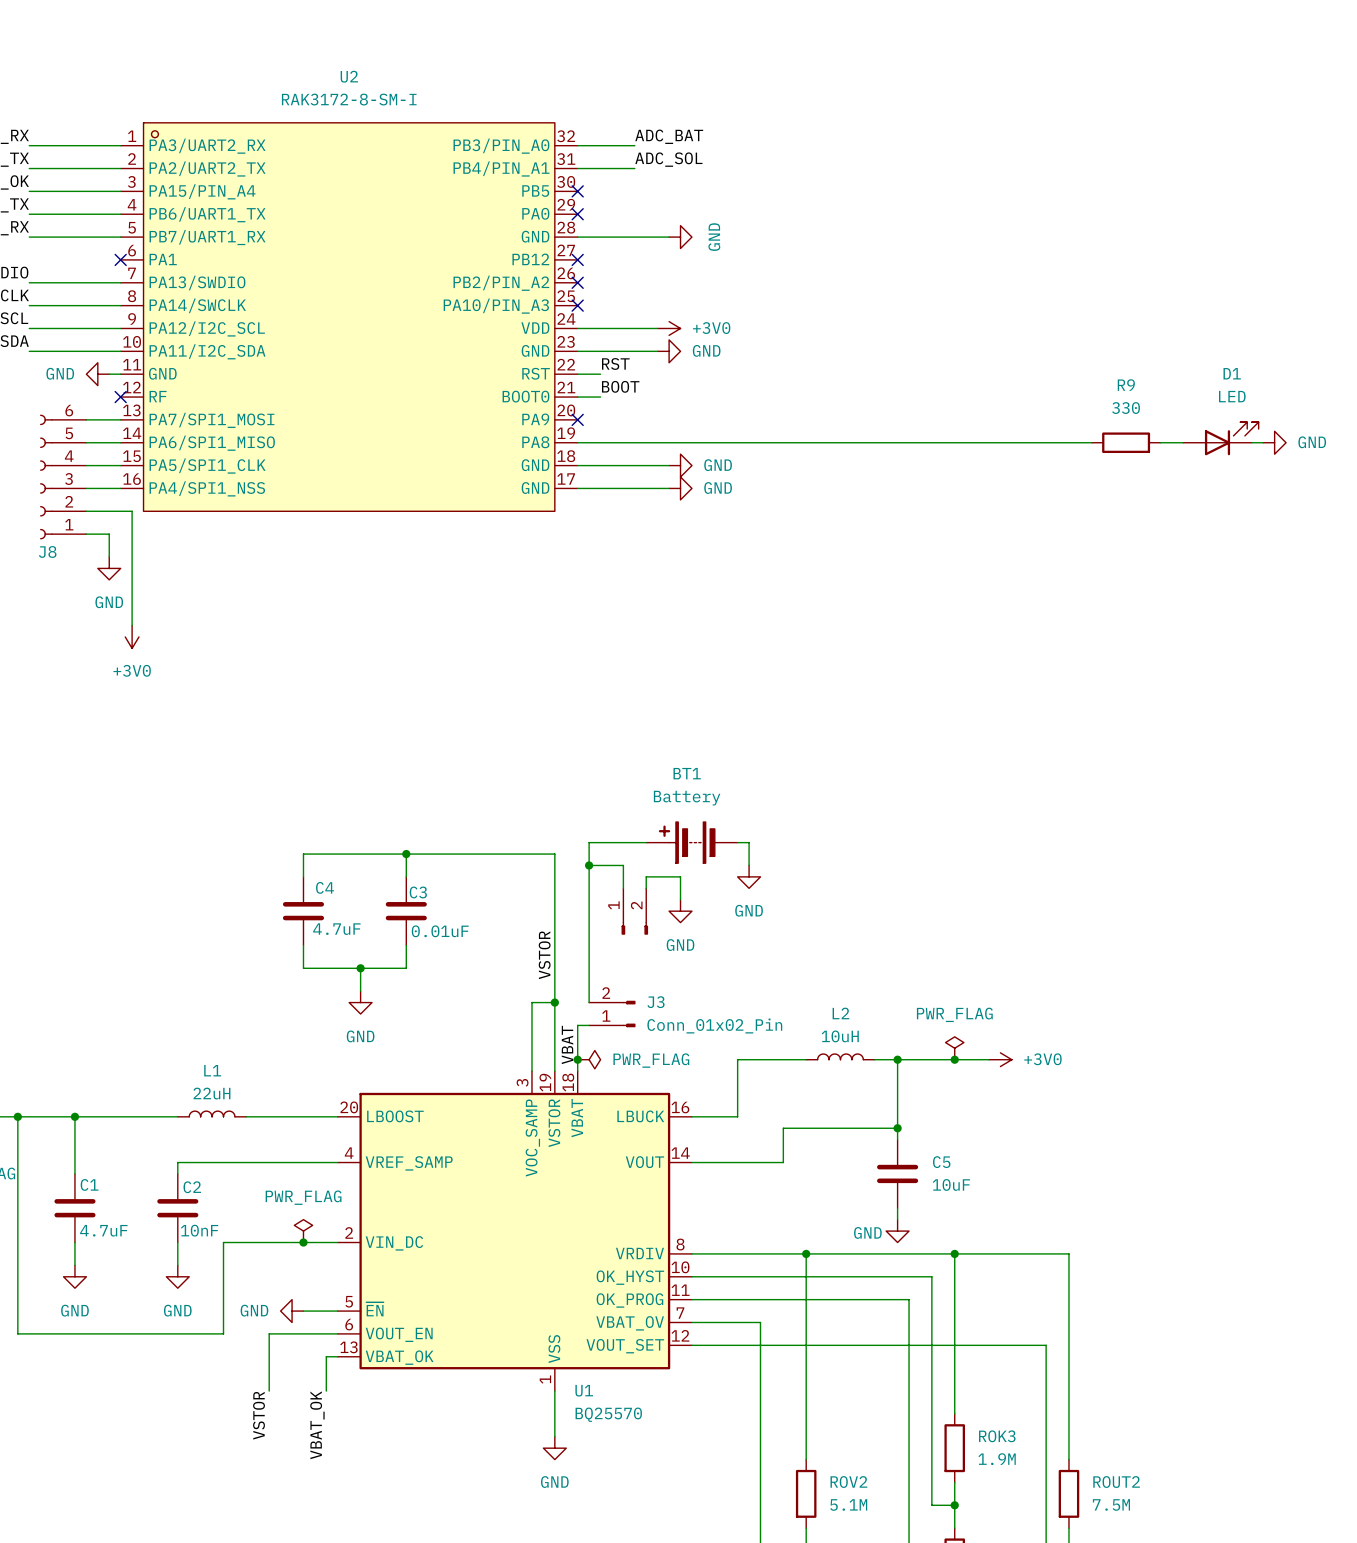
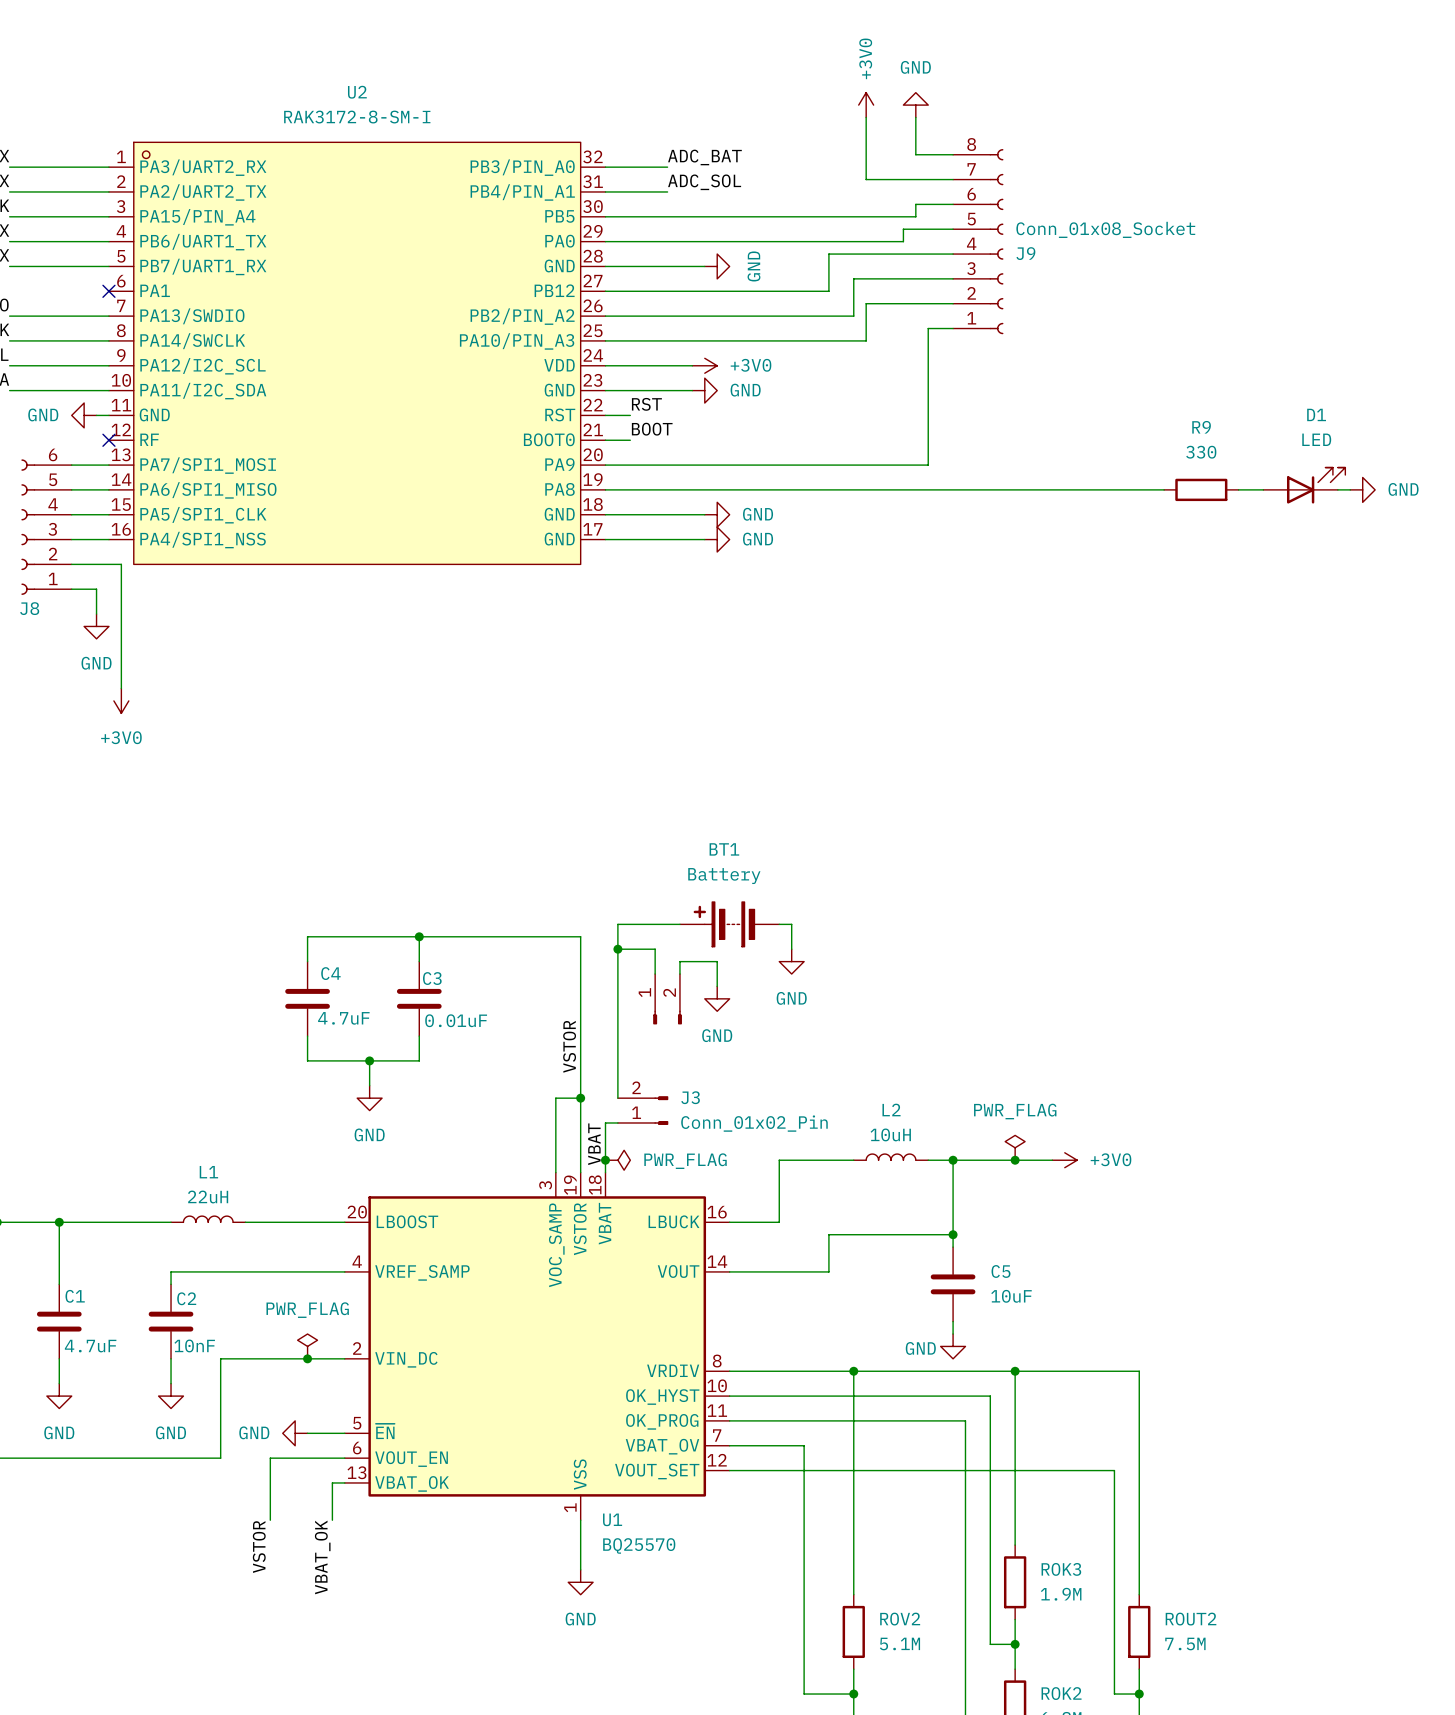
power symbol: none -> +3V0 (866, 105)
power symbol: none -> GND (915, 105)
wire: none -> (866, 117) (866, 179) (953, 179)
wire: none -> (915, 117) (915, 154) (953, 154)
wire: none -> (953, 204) (915, 204) (915, 216) (605, 216)
no-connect mark: (577, 191) -> none
wire: none -> (953, 229) (903, 229) (903, 241) (605, 241)
no-connect mark: (577, 214) -> none
J9: none -> Conn_01x08_Socket (978, 241)
wire: none -> (953, 254) (828, 254) (828, 291) (605, 291)
wire: none -> (953, 278) (853, 278) (853, 316) (605, 316)
no-connect mark: (577, 259) -> none
wire: none -> (953, 303) (866, 303) (866, 340) (605, 340)
no-connect mark: (577, 282) -> none
wire: none -> (953, 328) (928, 328) (928, 465) (605, 465)
no-connect mark: (577, 305) -> none
no-connect mark: (577, 419) -> none

